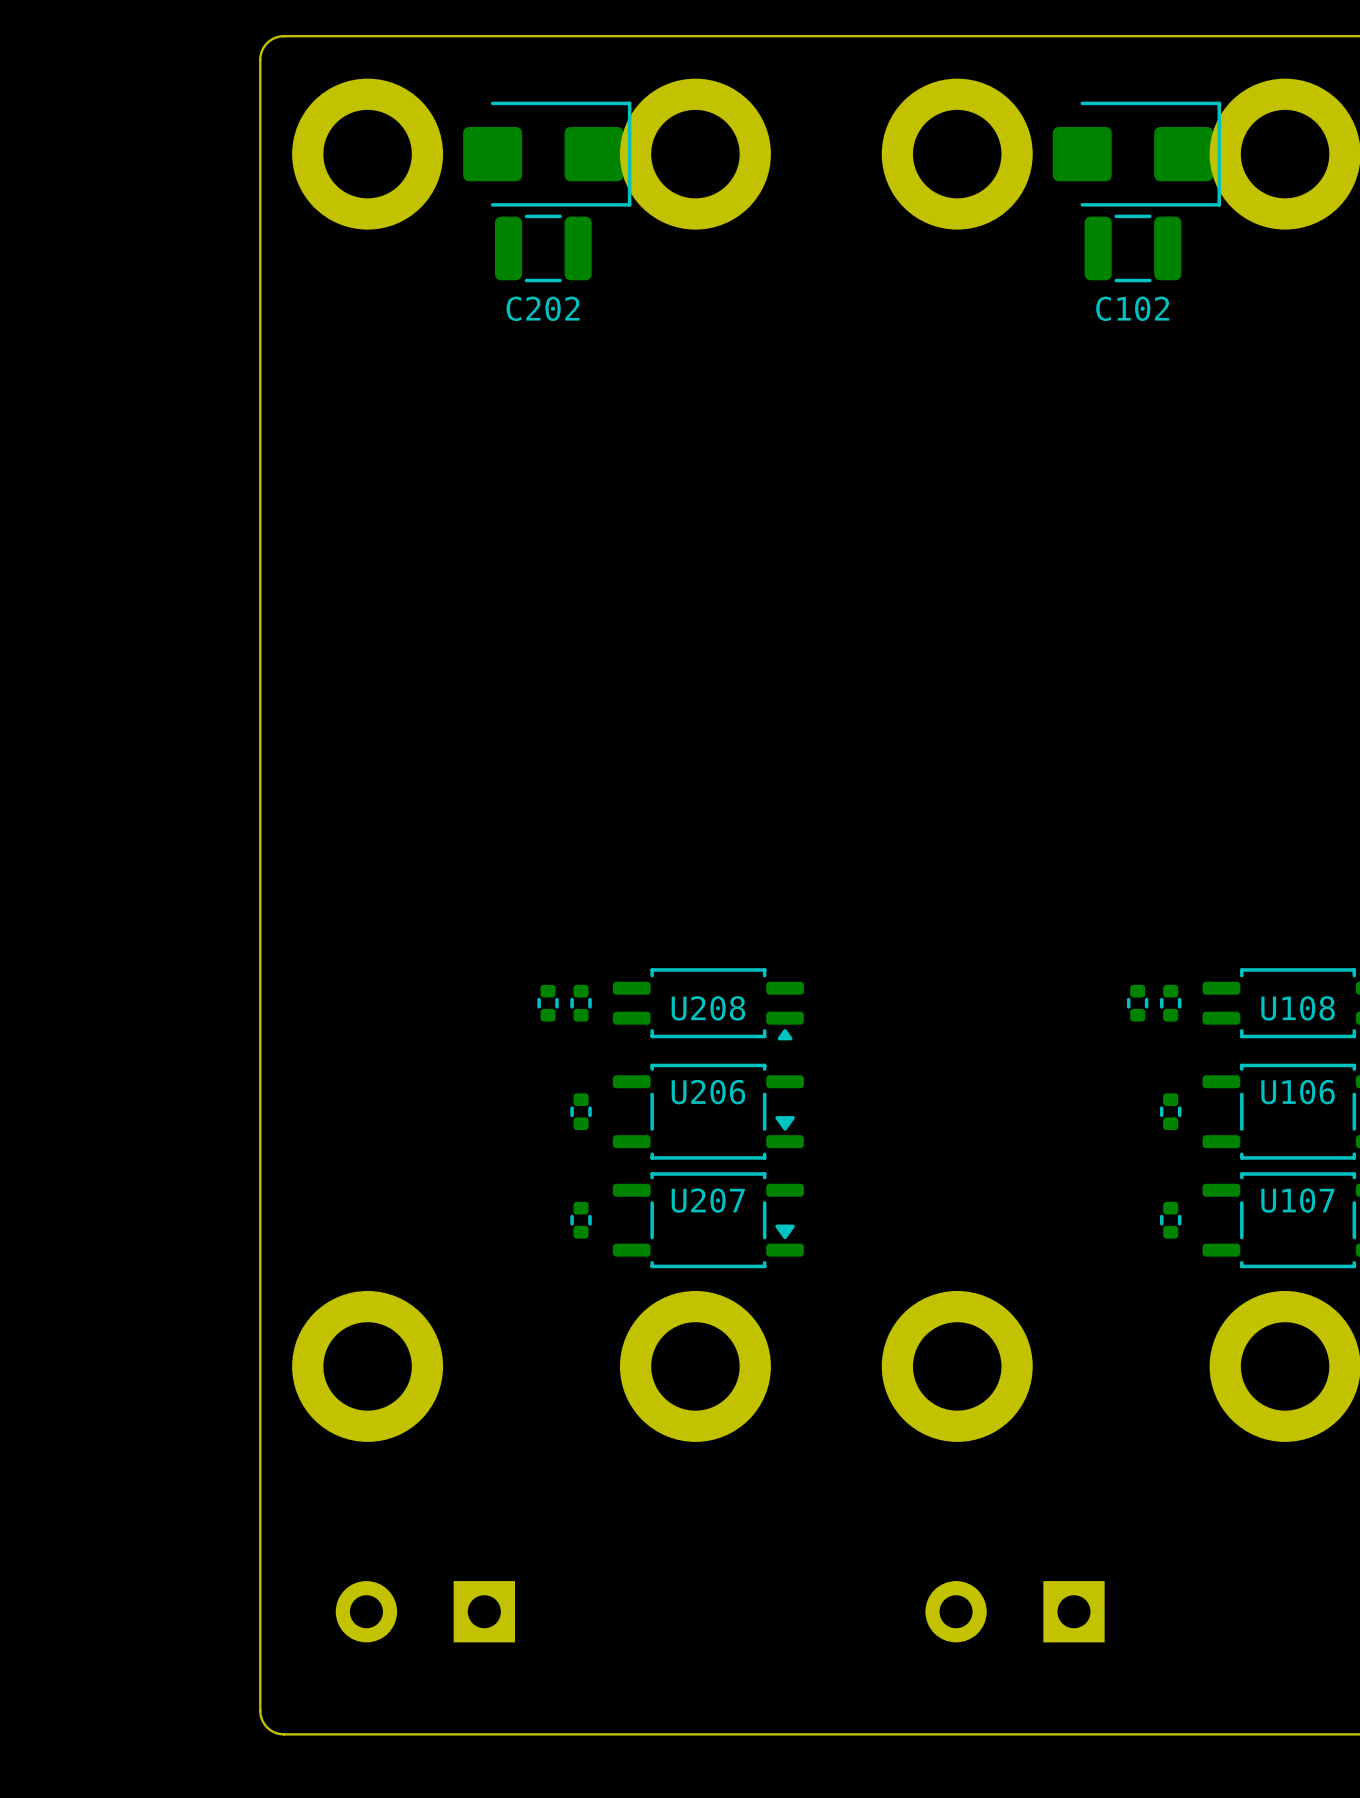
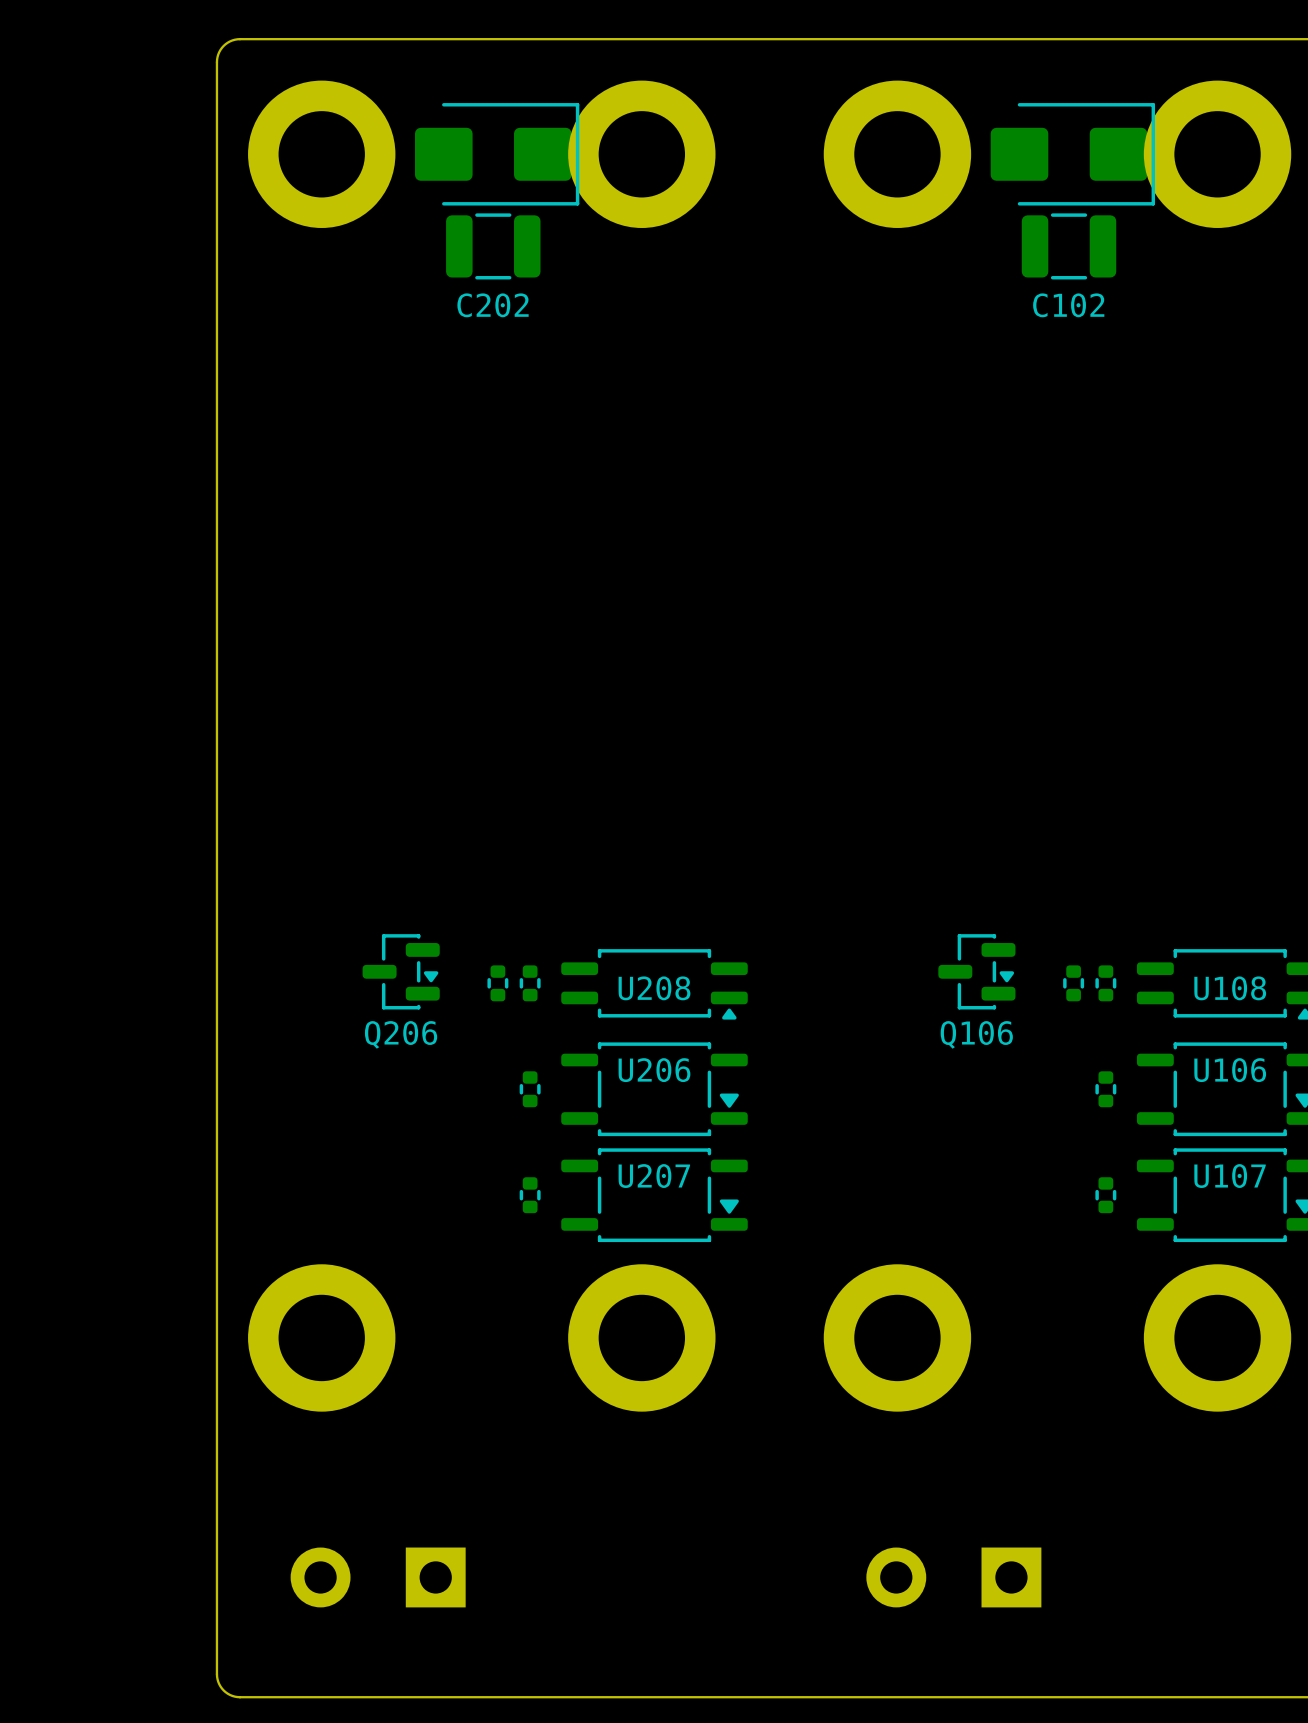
Q206: none -> (401, 971)
Q106: none -> (976, 971)

